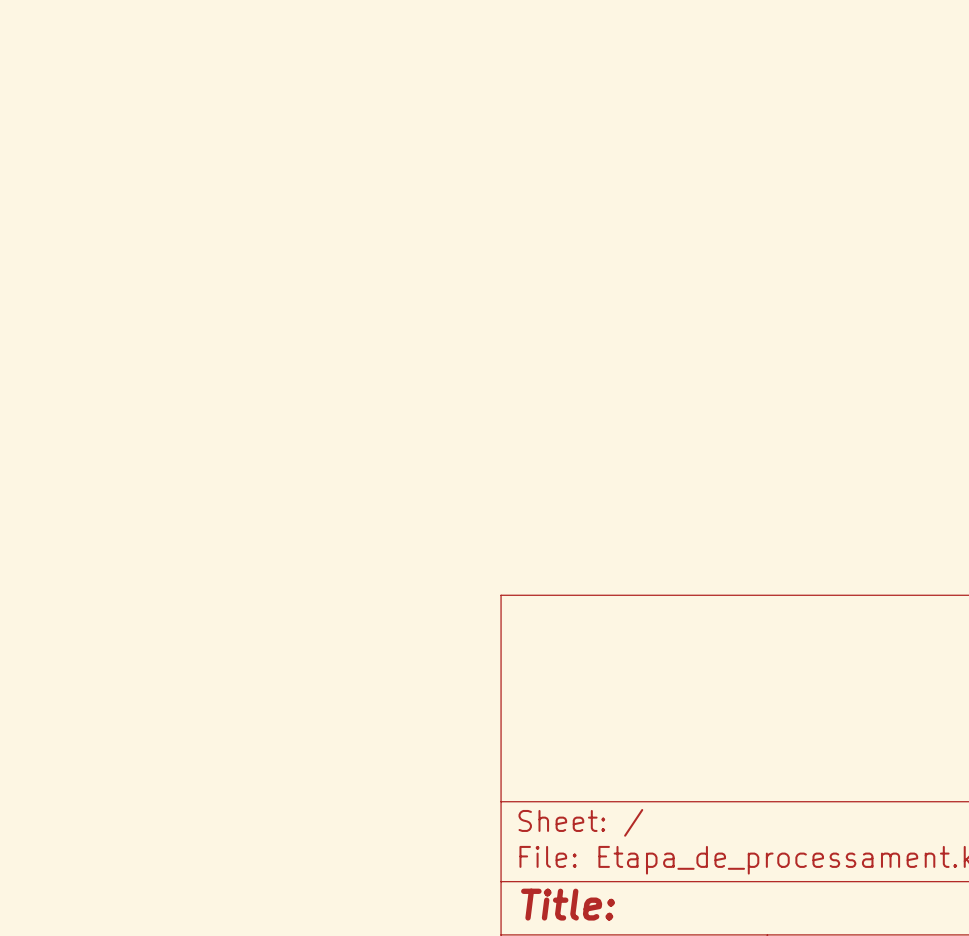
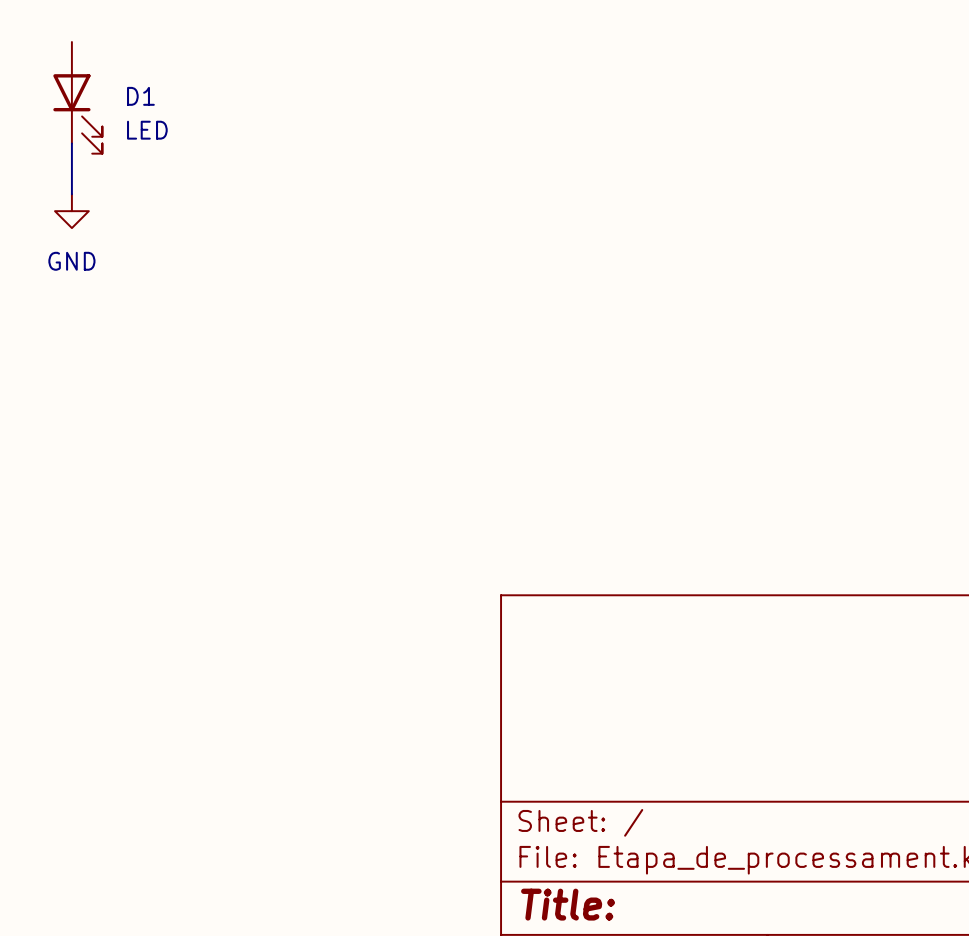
D1: none -> LED (77, 97)
wire: none -> (71, 143) (71, 194)
power symbol: none -> GND (71, 211)

